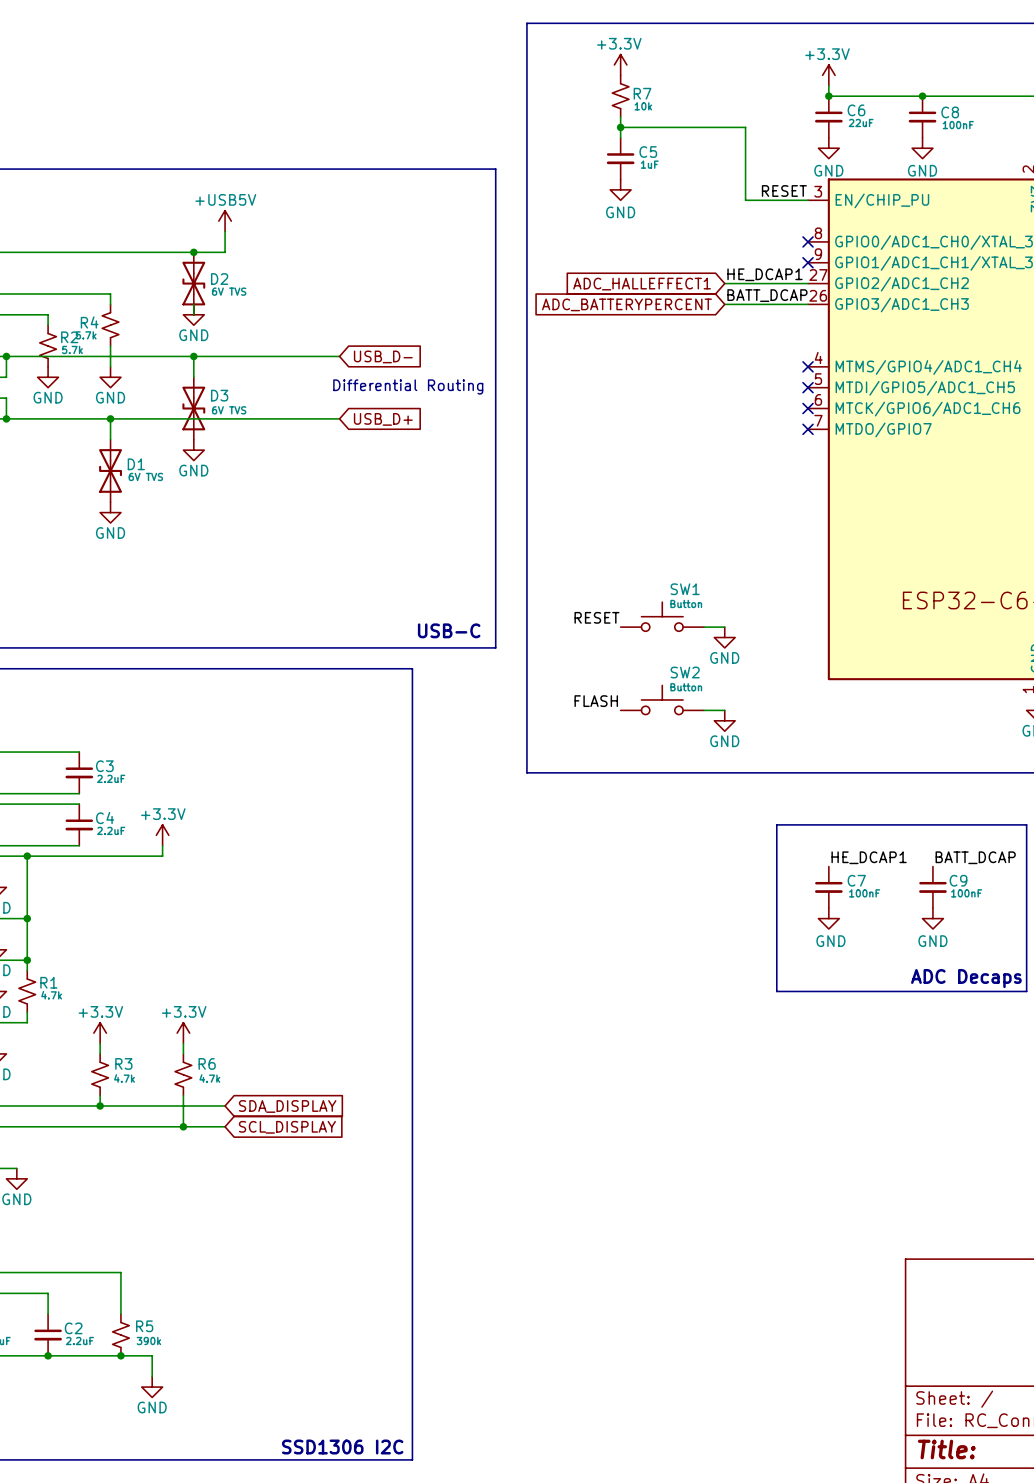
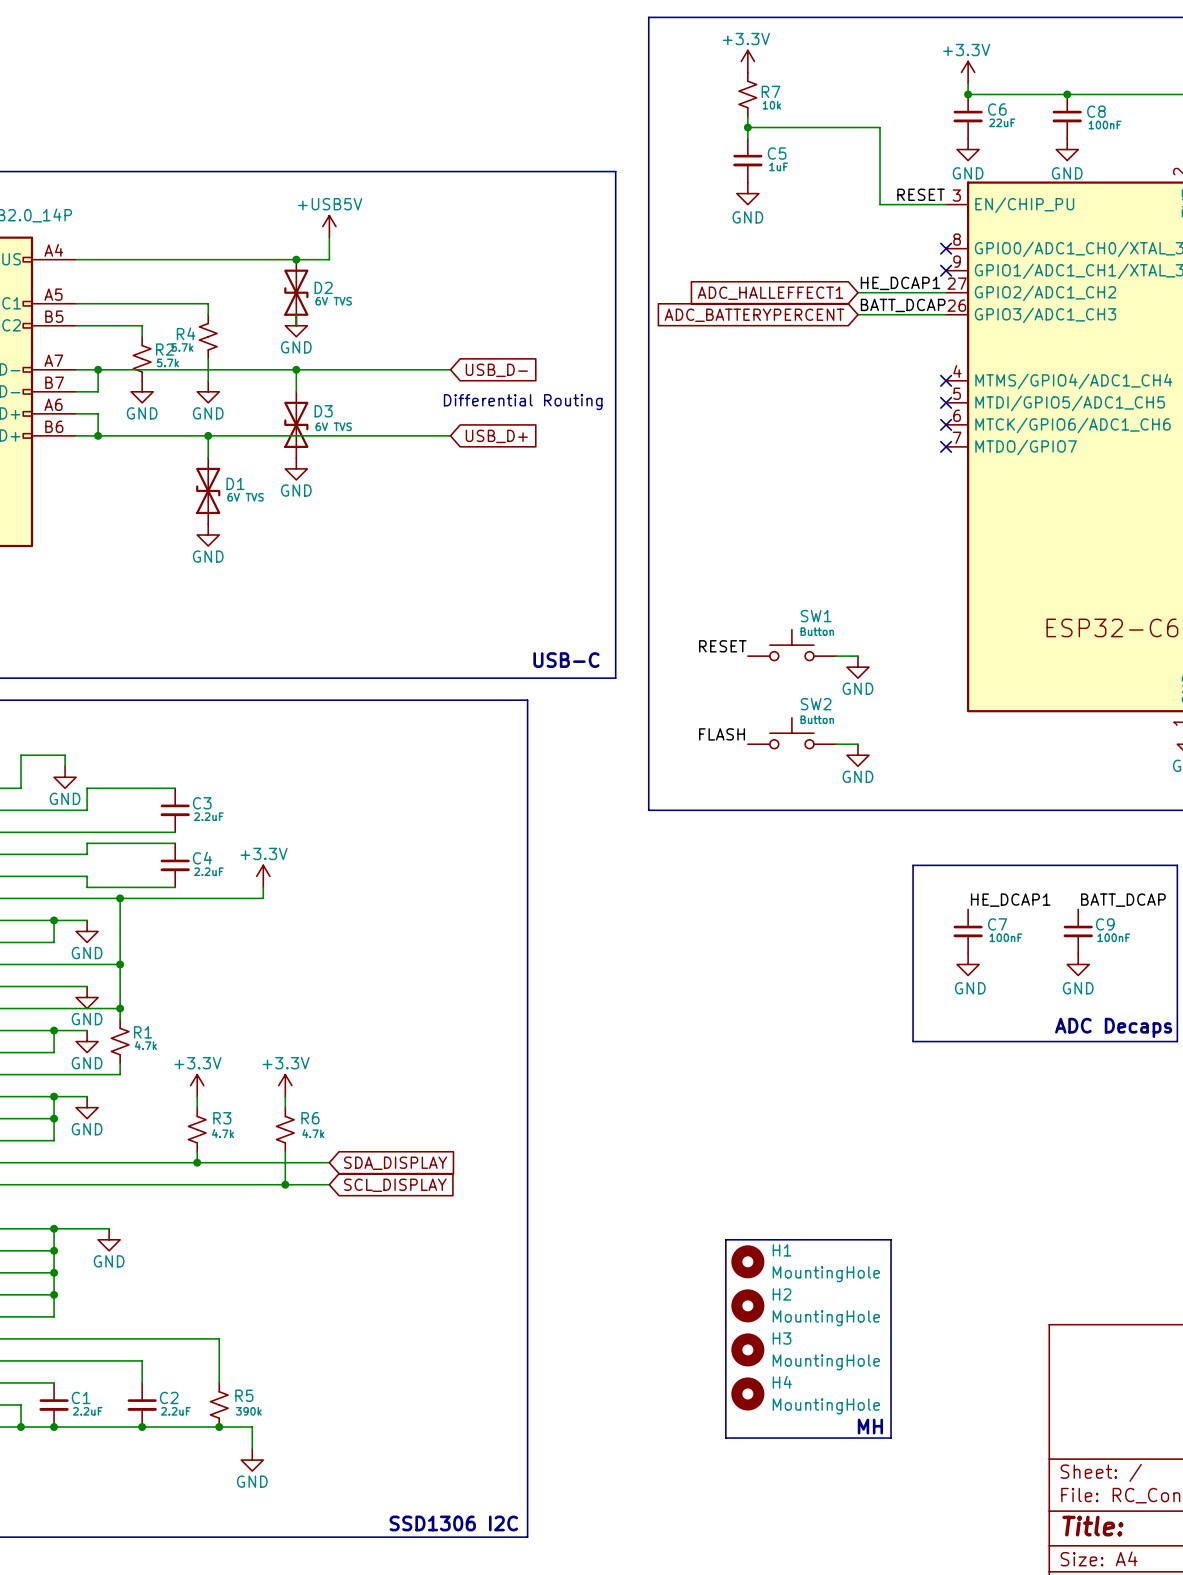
line: none -> (725, 1239) (891, 1239) (891, 1438) (725, 1438) (725, 1239)
H1: none -> MountingHole (747, 1261)
H2: none -> MountingHole (747, 1305)
H3: none -> MountingHole (747, 1349)
H4: none -> MountingHole (747, 1393)
text: none -> MH (870, 1426)

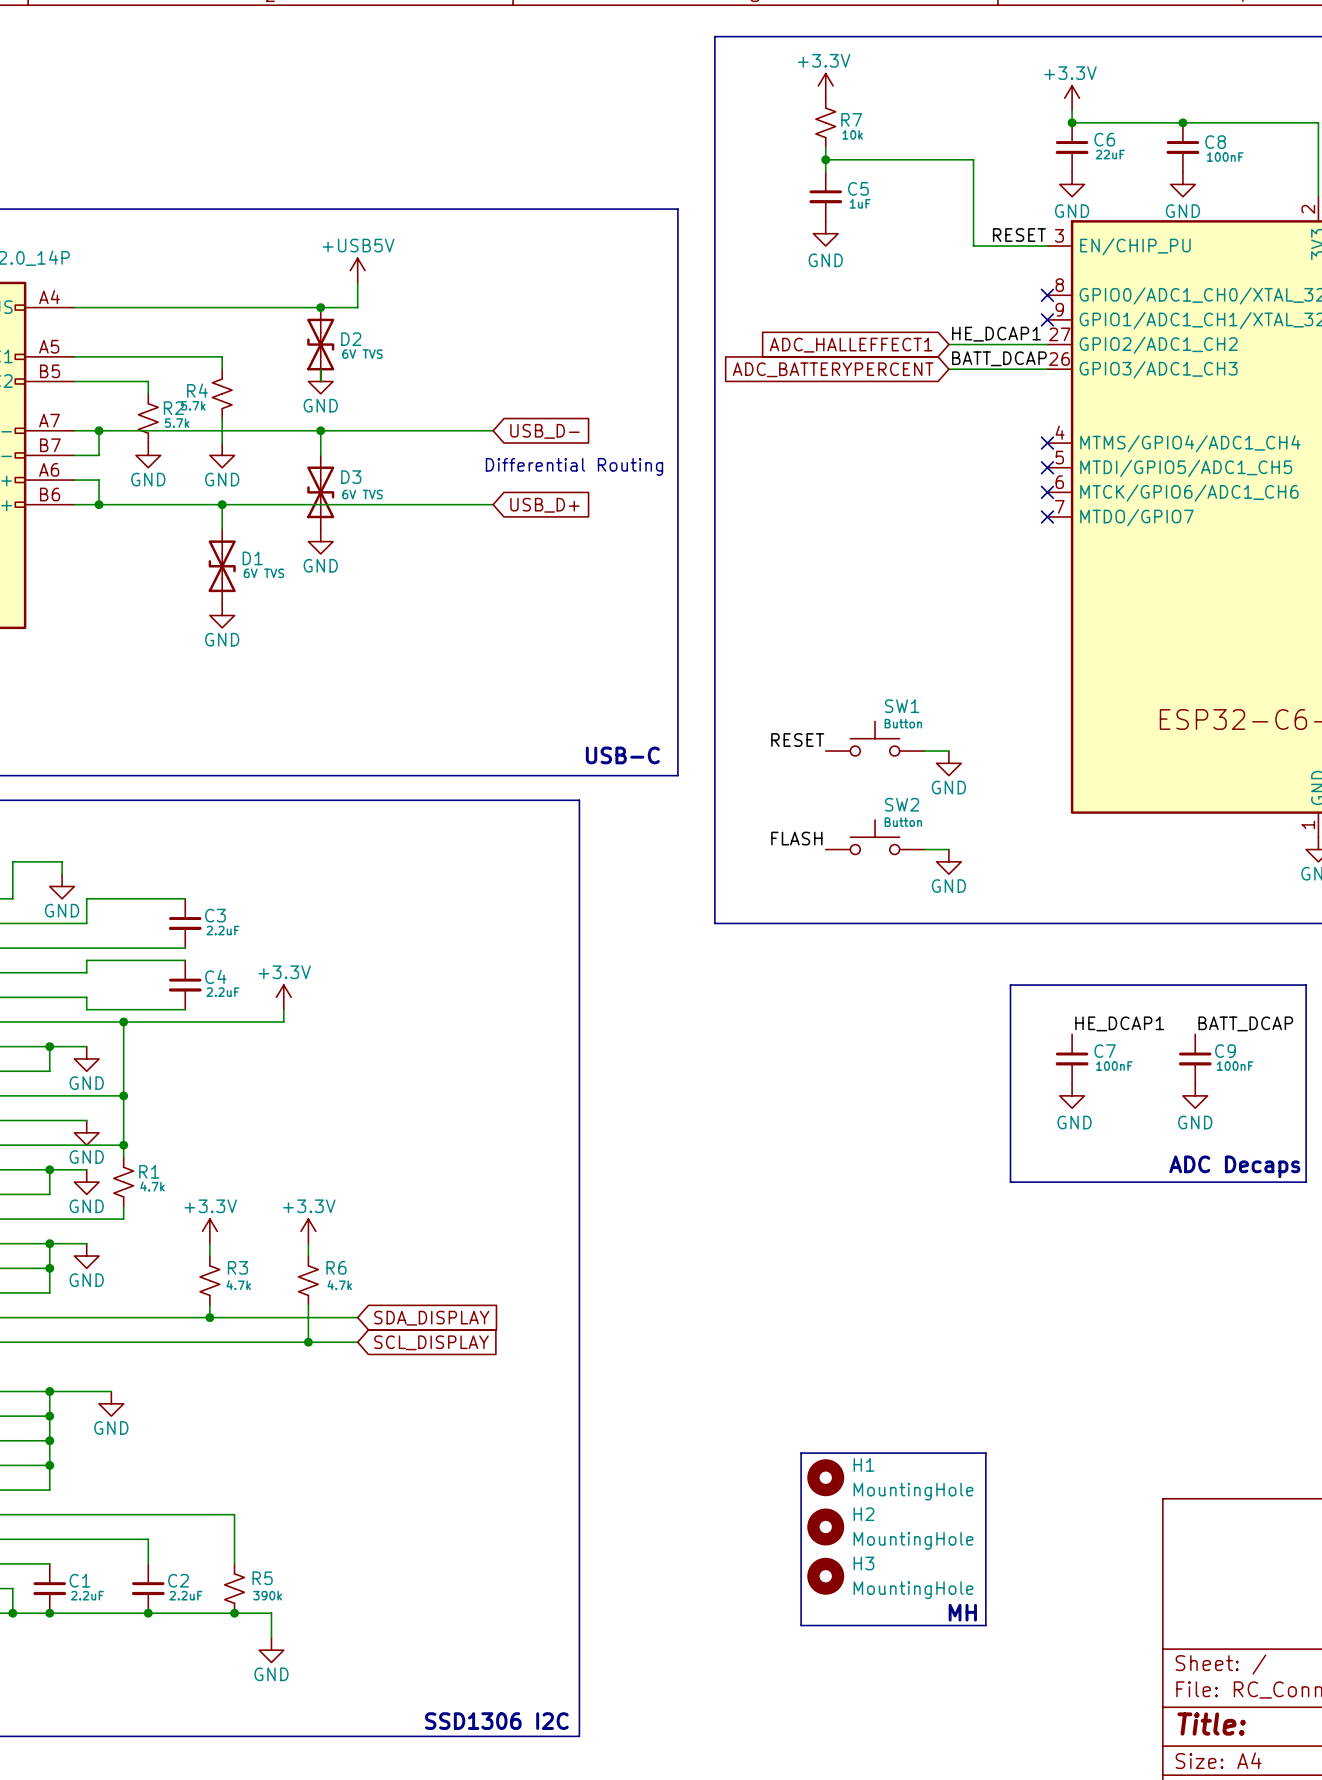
H1: MountingHole (747, 1261) -> none
line: (725, 1283) (725, 1239) (891, 1239) (891, 1283) -> (801, 1453) (985, 1453)
H2 name: H2 (782, 1294) -> H1 (863, 1464)
H3 name: H3 (782, 1338) -> H2 (863, 1514)
H4 name: H4 (782, 1382) -> H3 (863, 1563)

